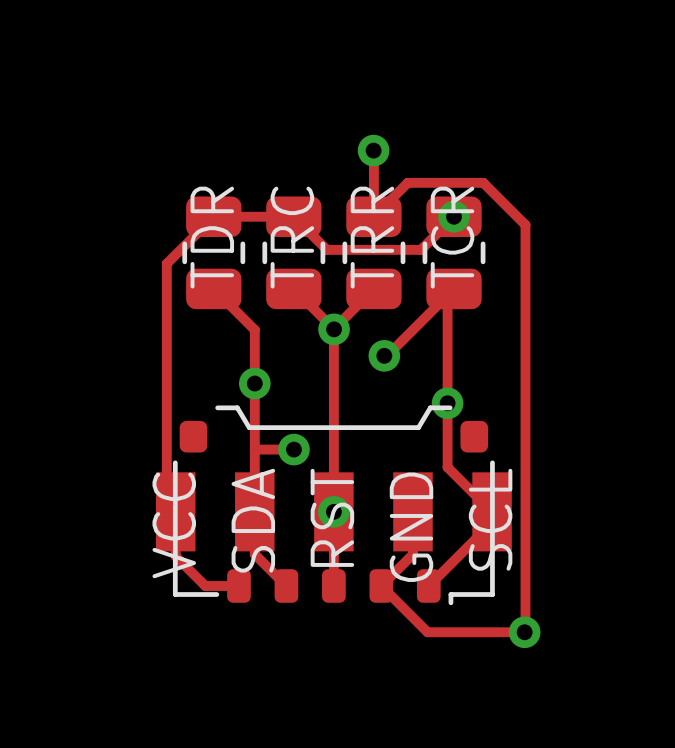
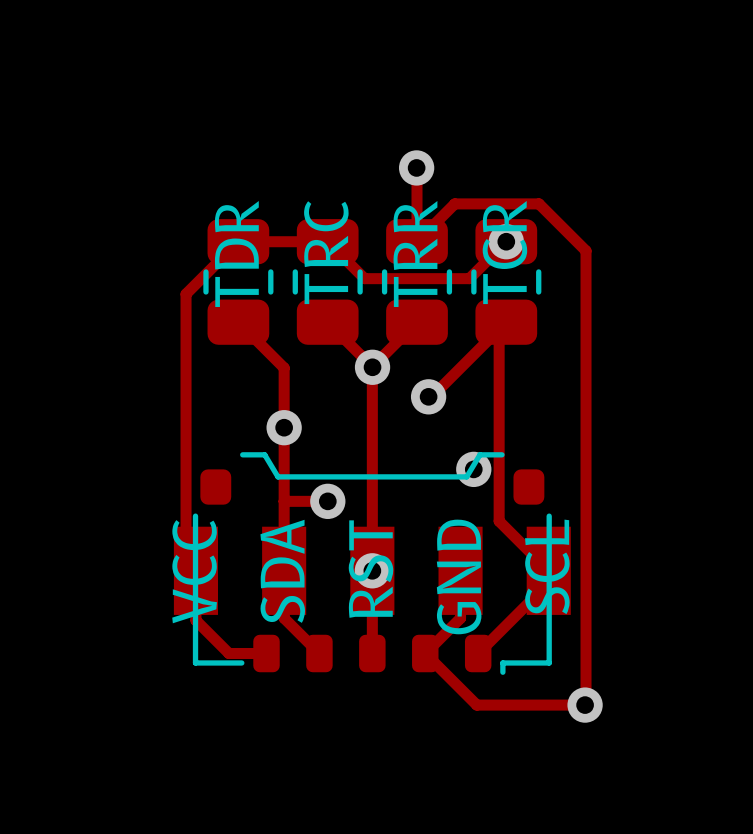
via position: (447, 403) -> (473, 469)

